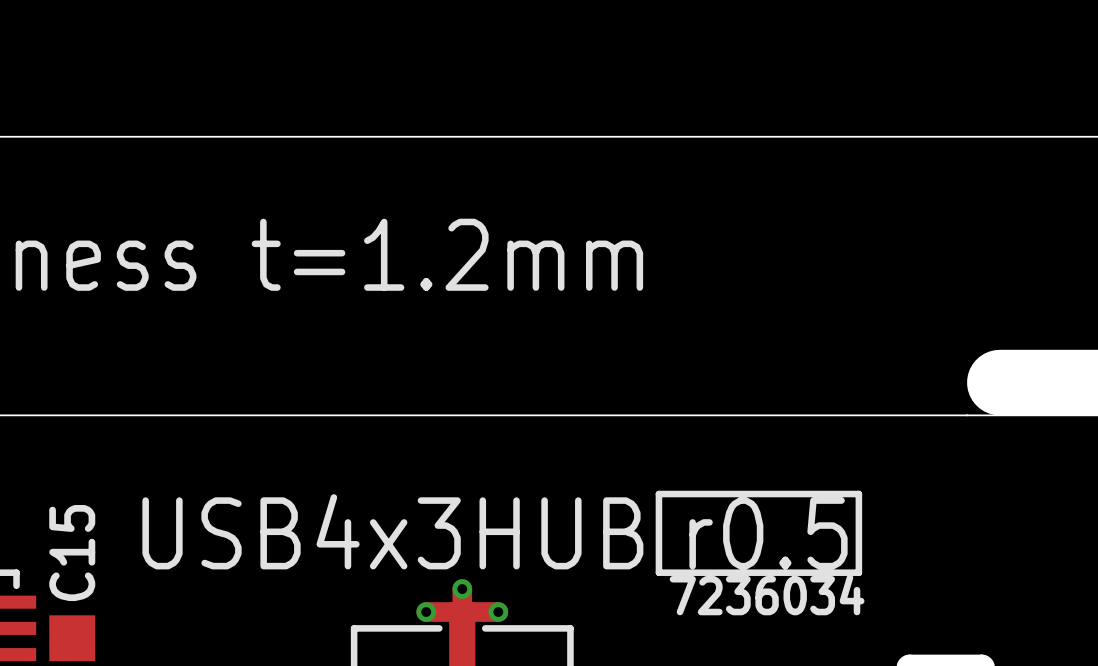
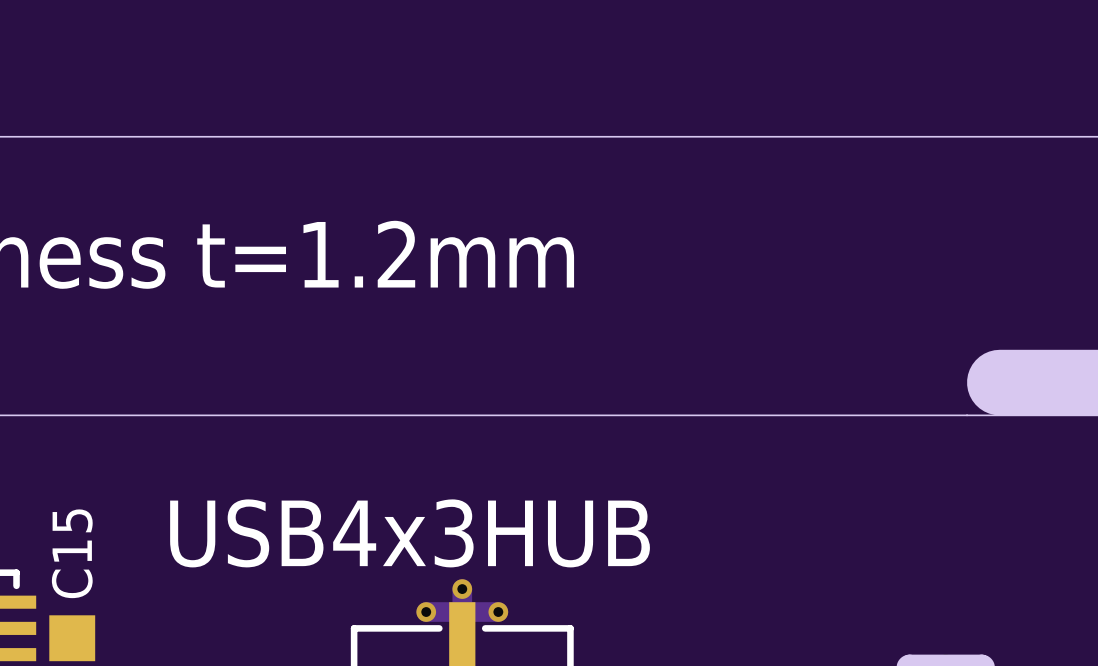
drawing: [655, 490, 863, 576] -> none

